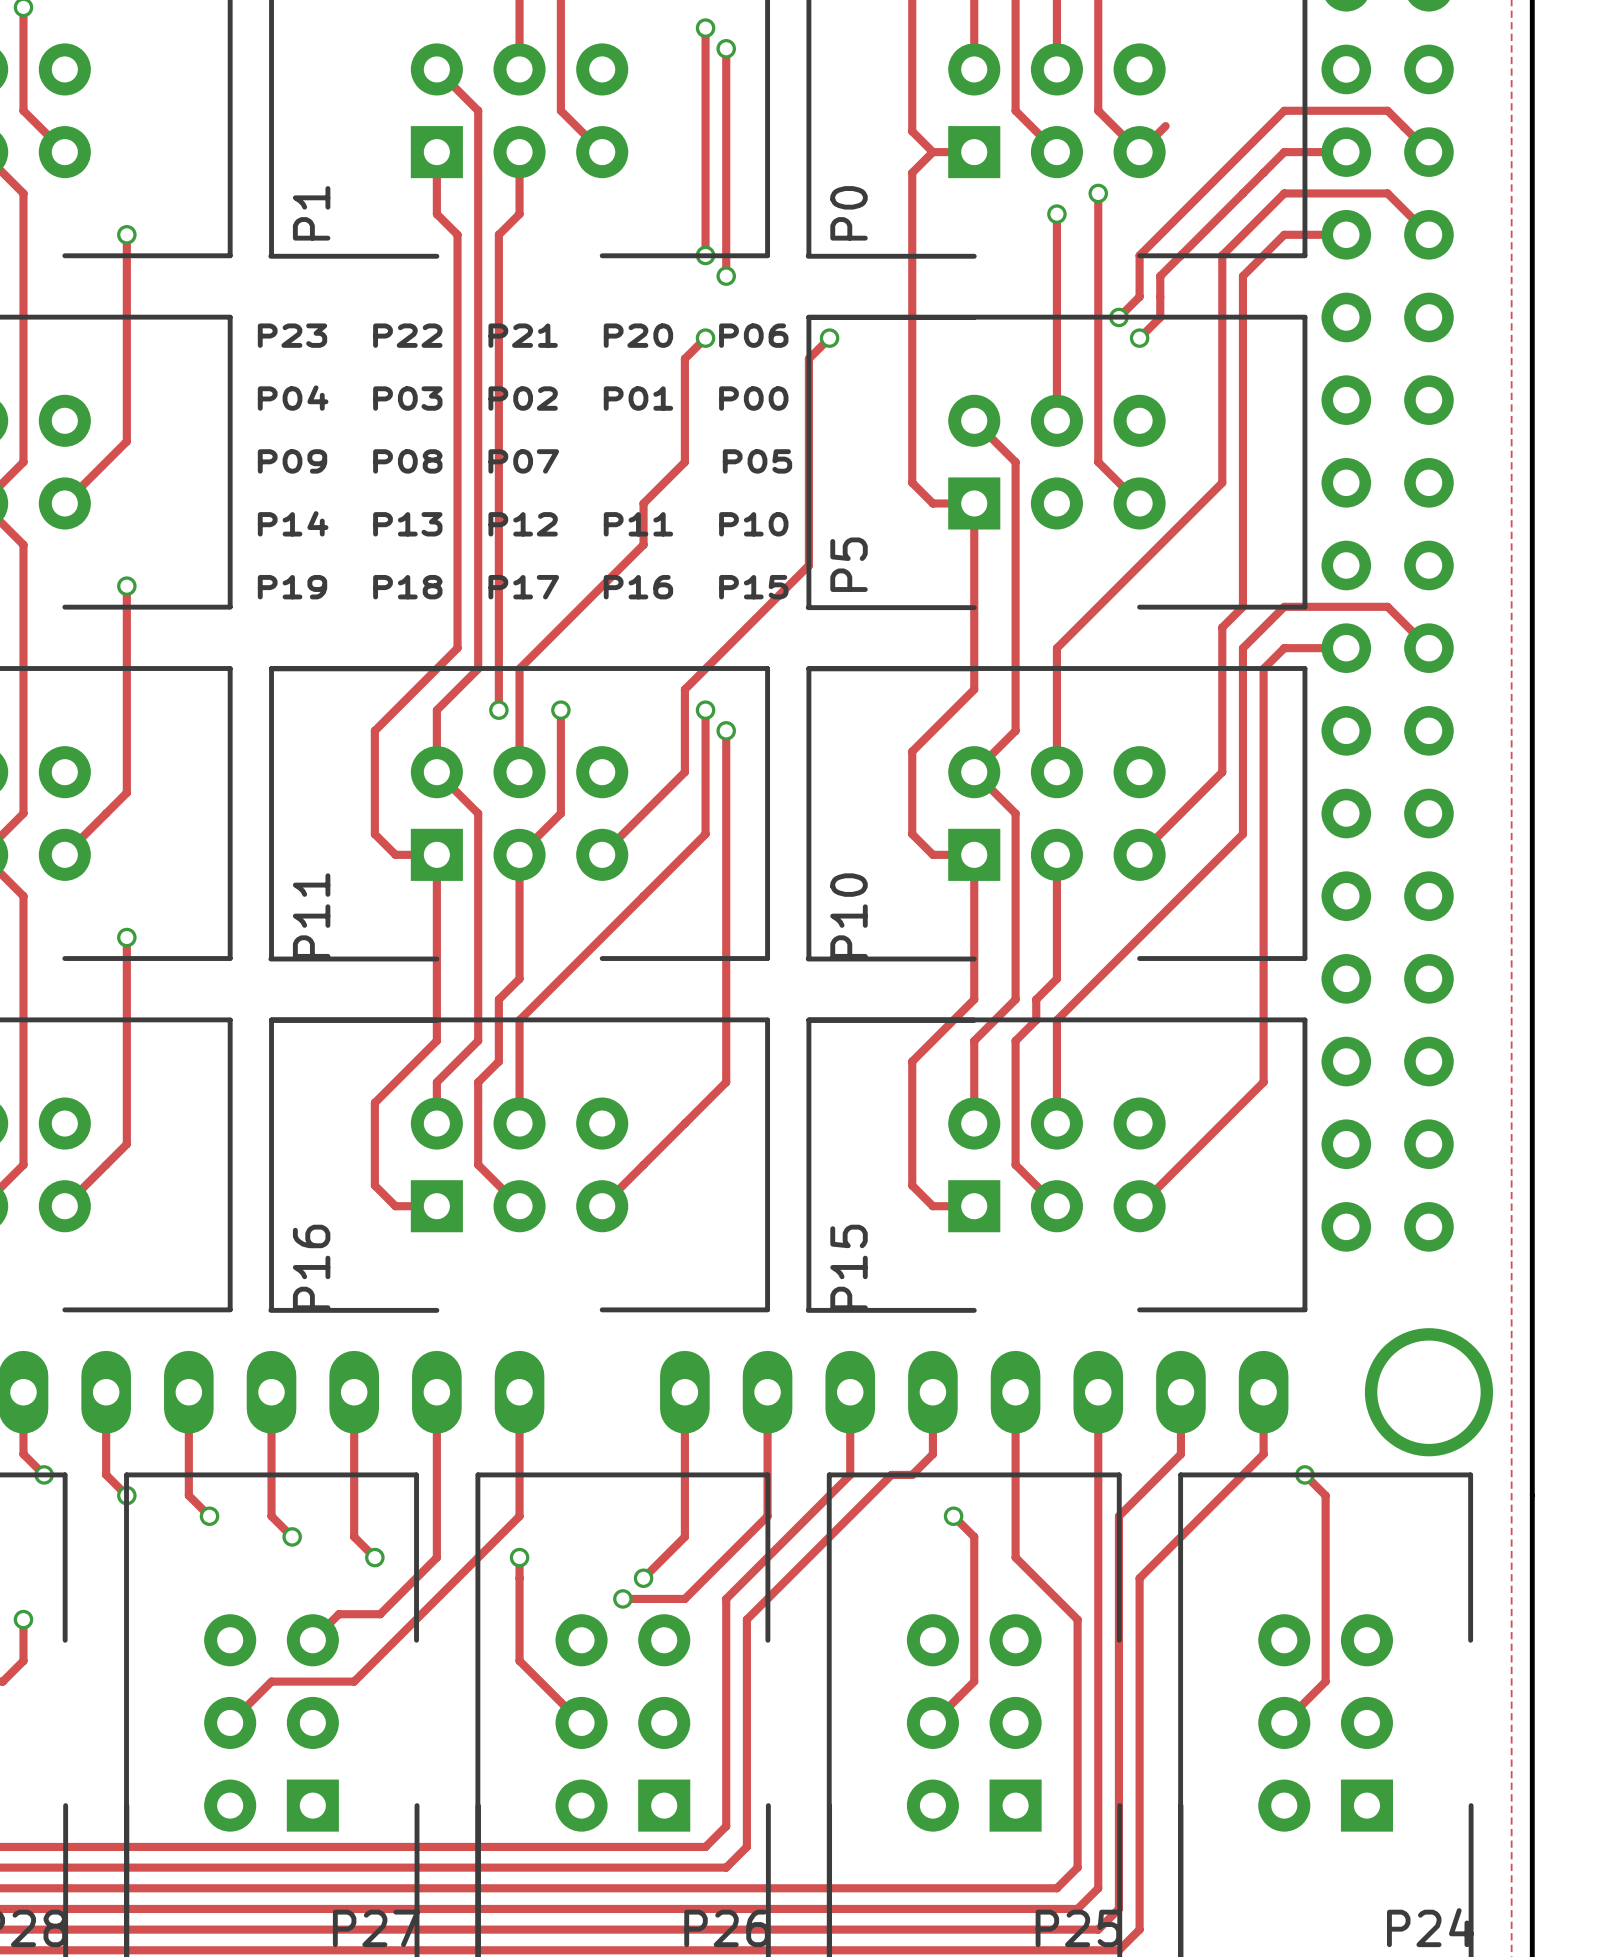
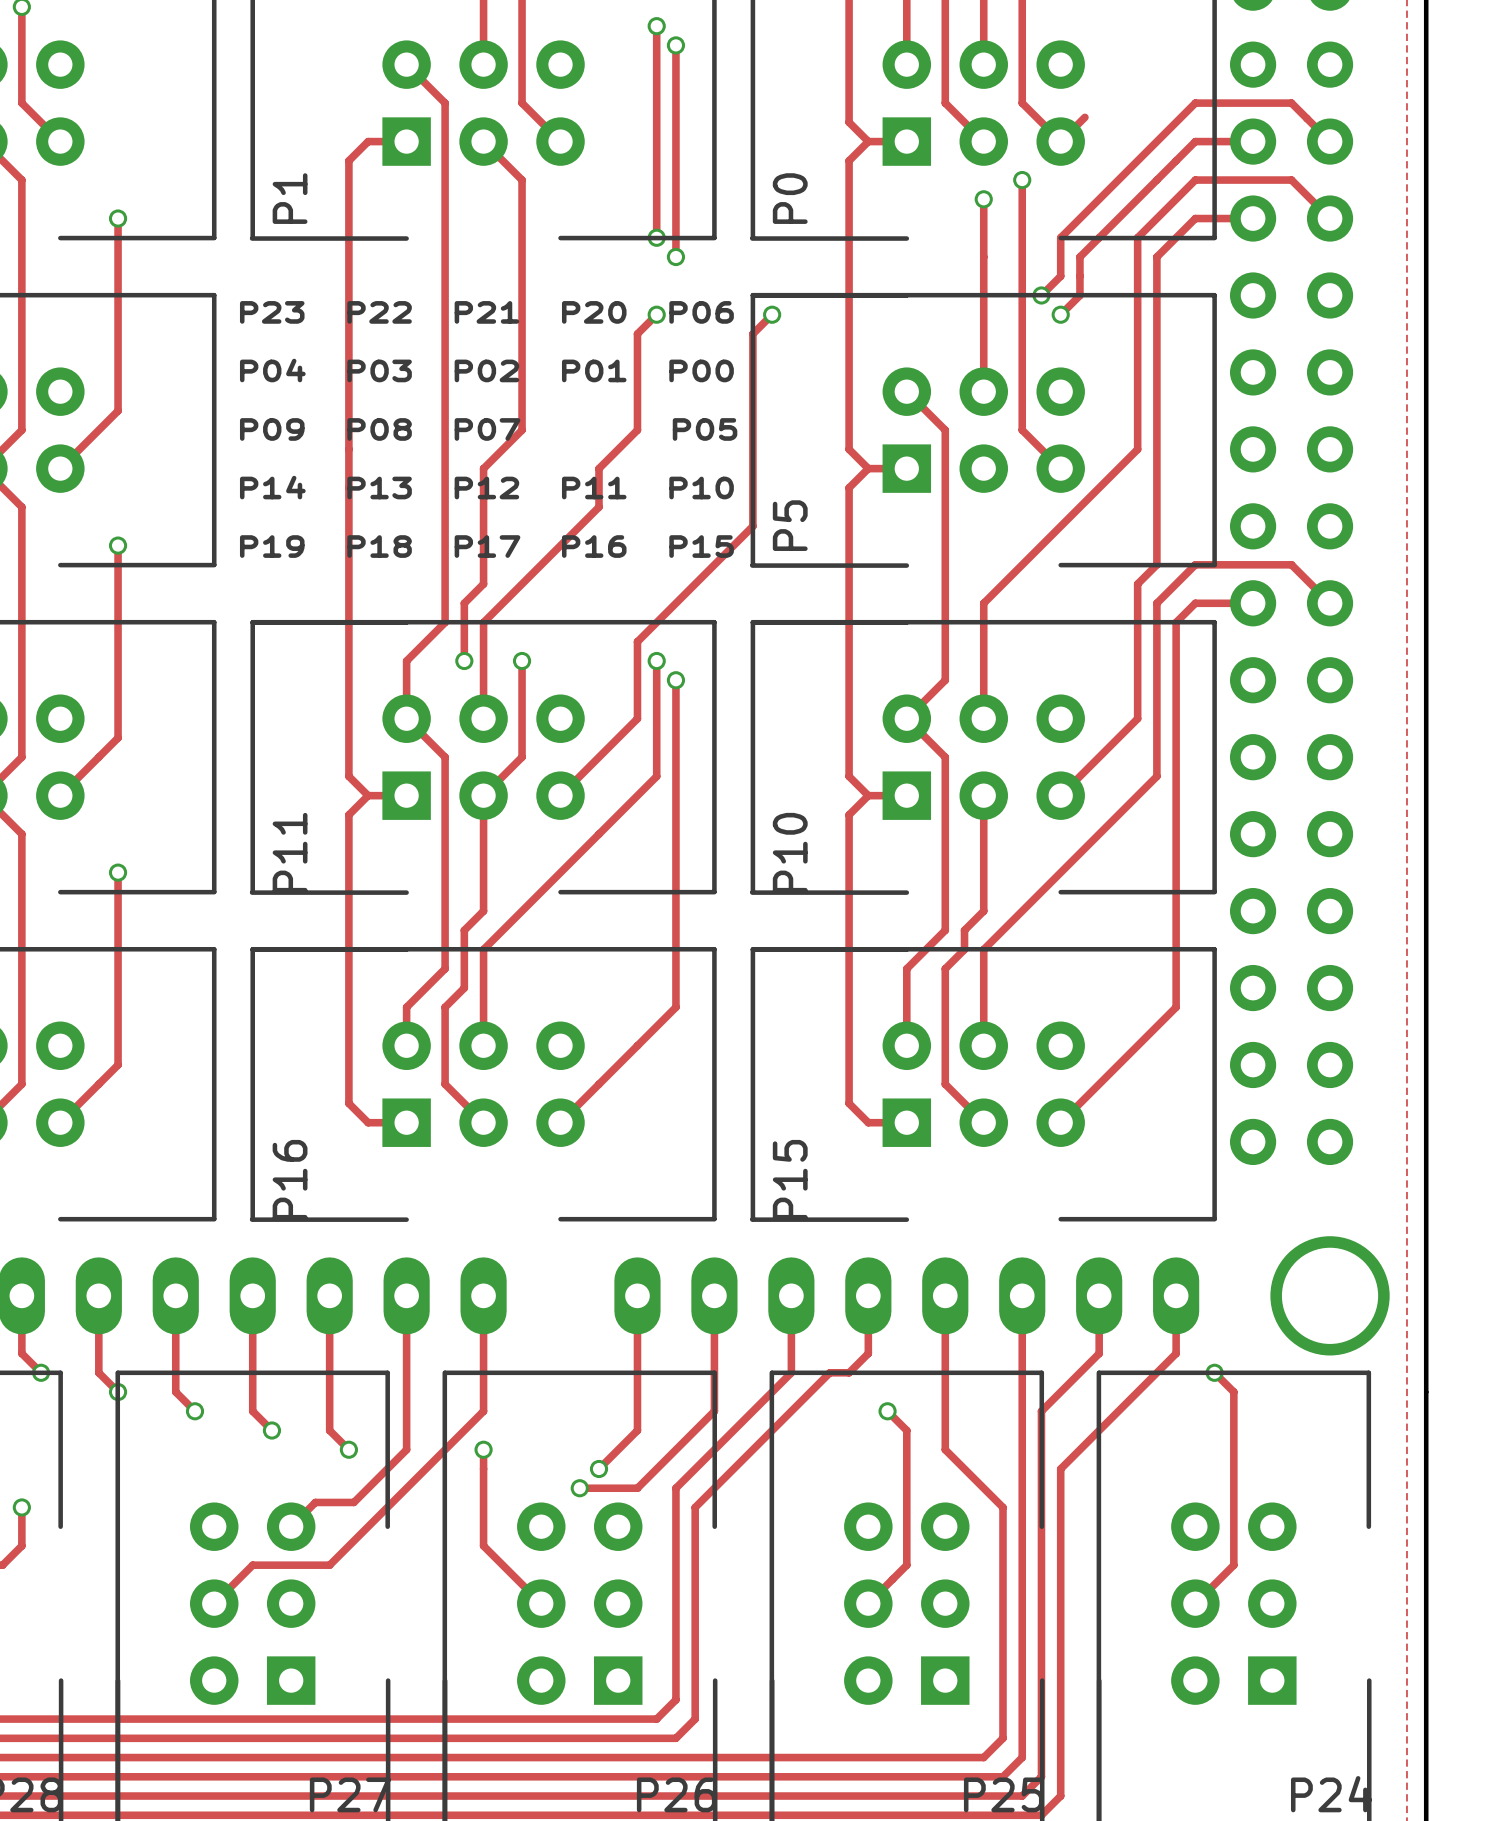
track: (436, 152) (436, 214) (457, 234) (457, 648) (374, 730) -> (406, 141) (368, 141) (348, 160) (348, 680)
track: (519, 152) (519, 214) (498, 234) (498, 648) -> (483, 141) (522, 180) (522, 430) (483, 468) (483, 584) (464, 603)
track: (974, 503) (974, 689) (912, 751) -> (868, 468) (849, 487) (849, 699)
track: (436, 854) (436, 1040) (374, 1102) -> (368, 795) (348, 814) (348, 1026)
track: (974, 854) (974, 999) (912, 1061) -> (868, 795) (849, 814) (849, 988)

